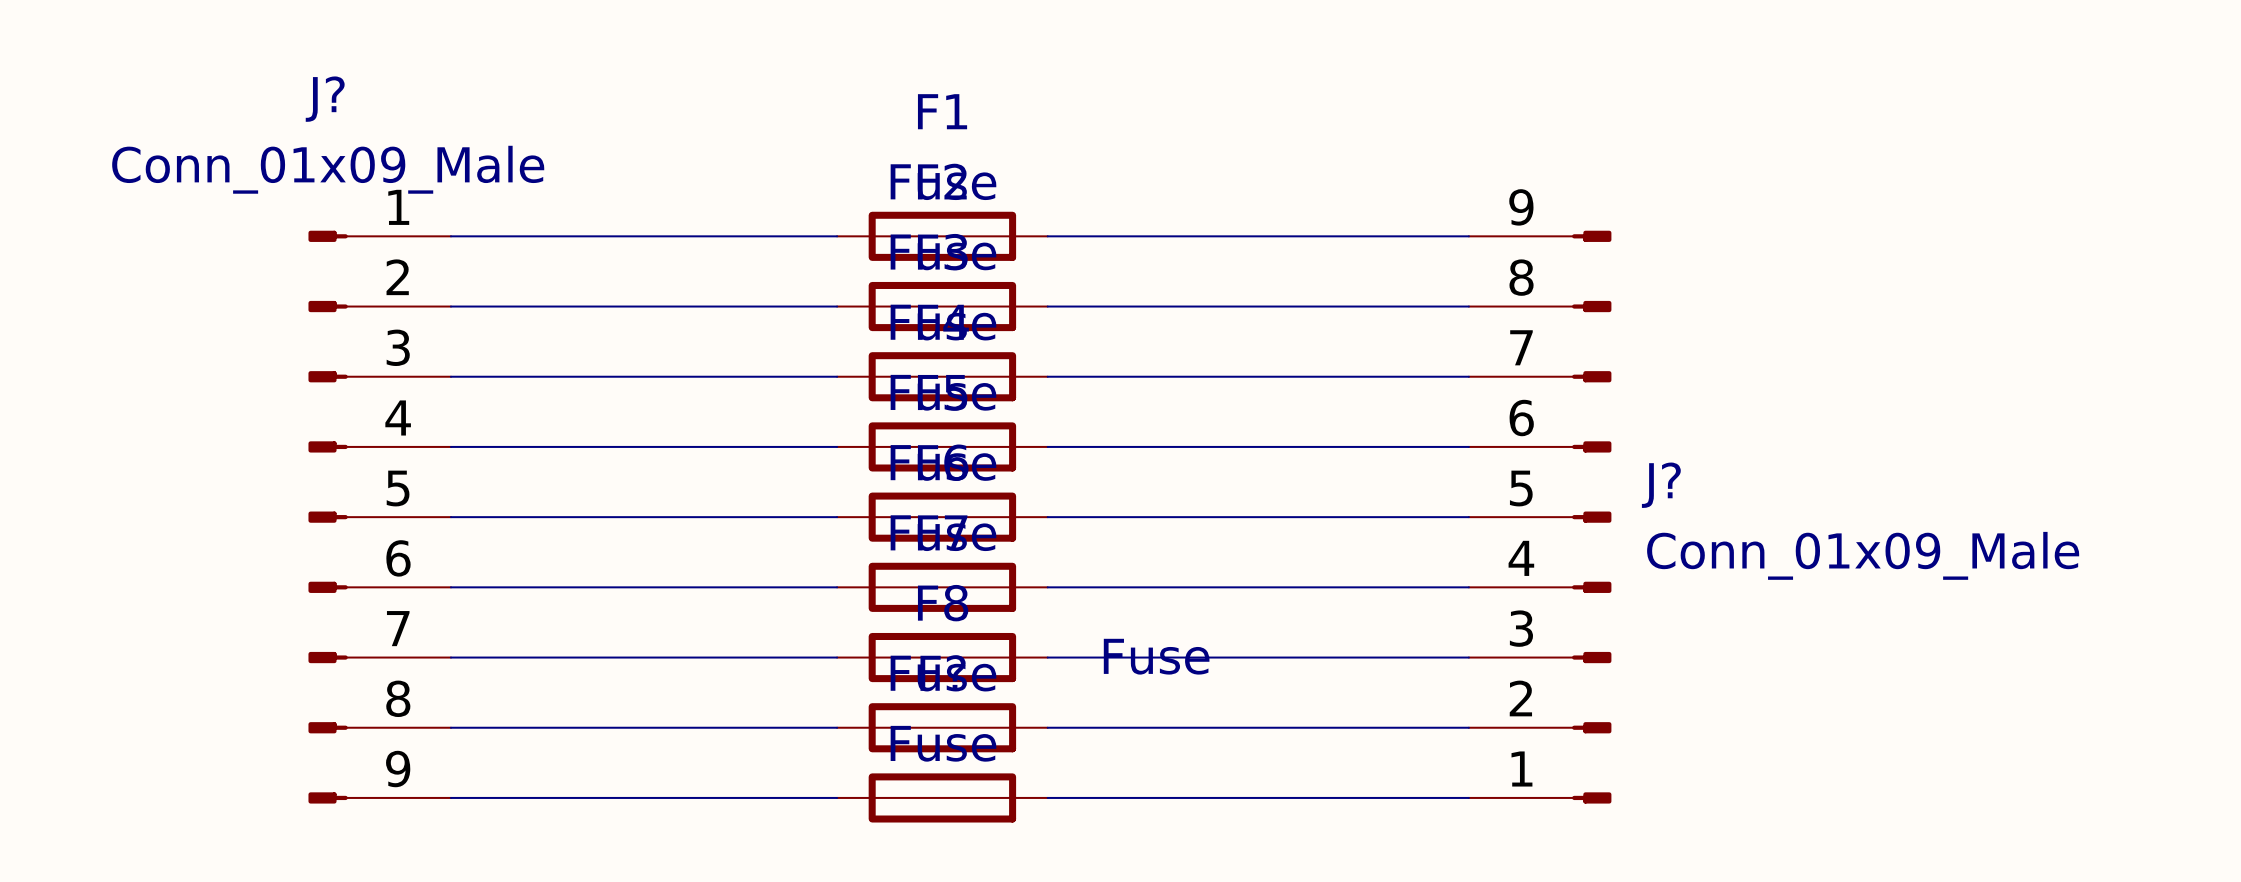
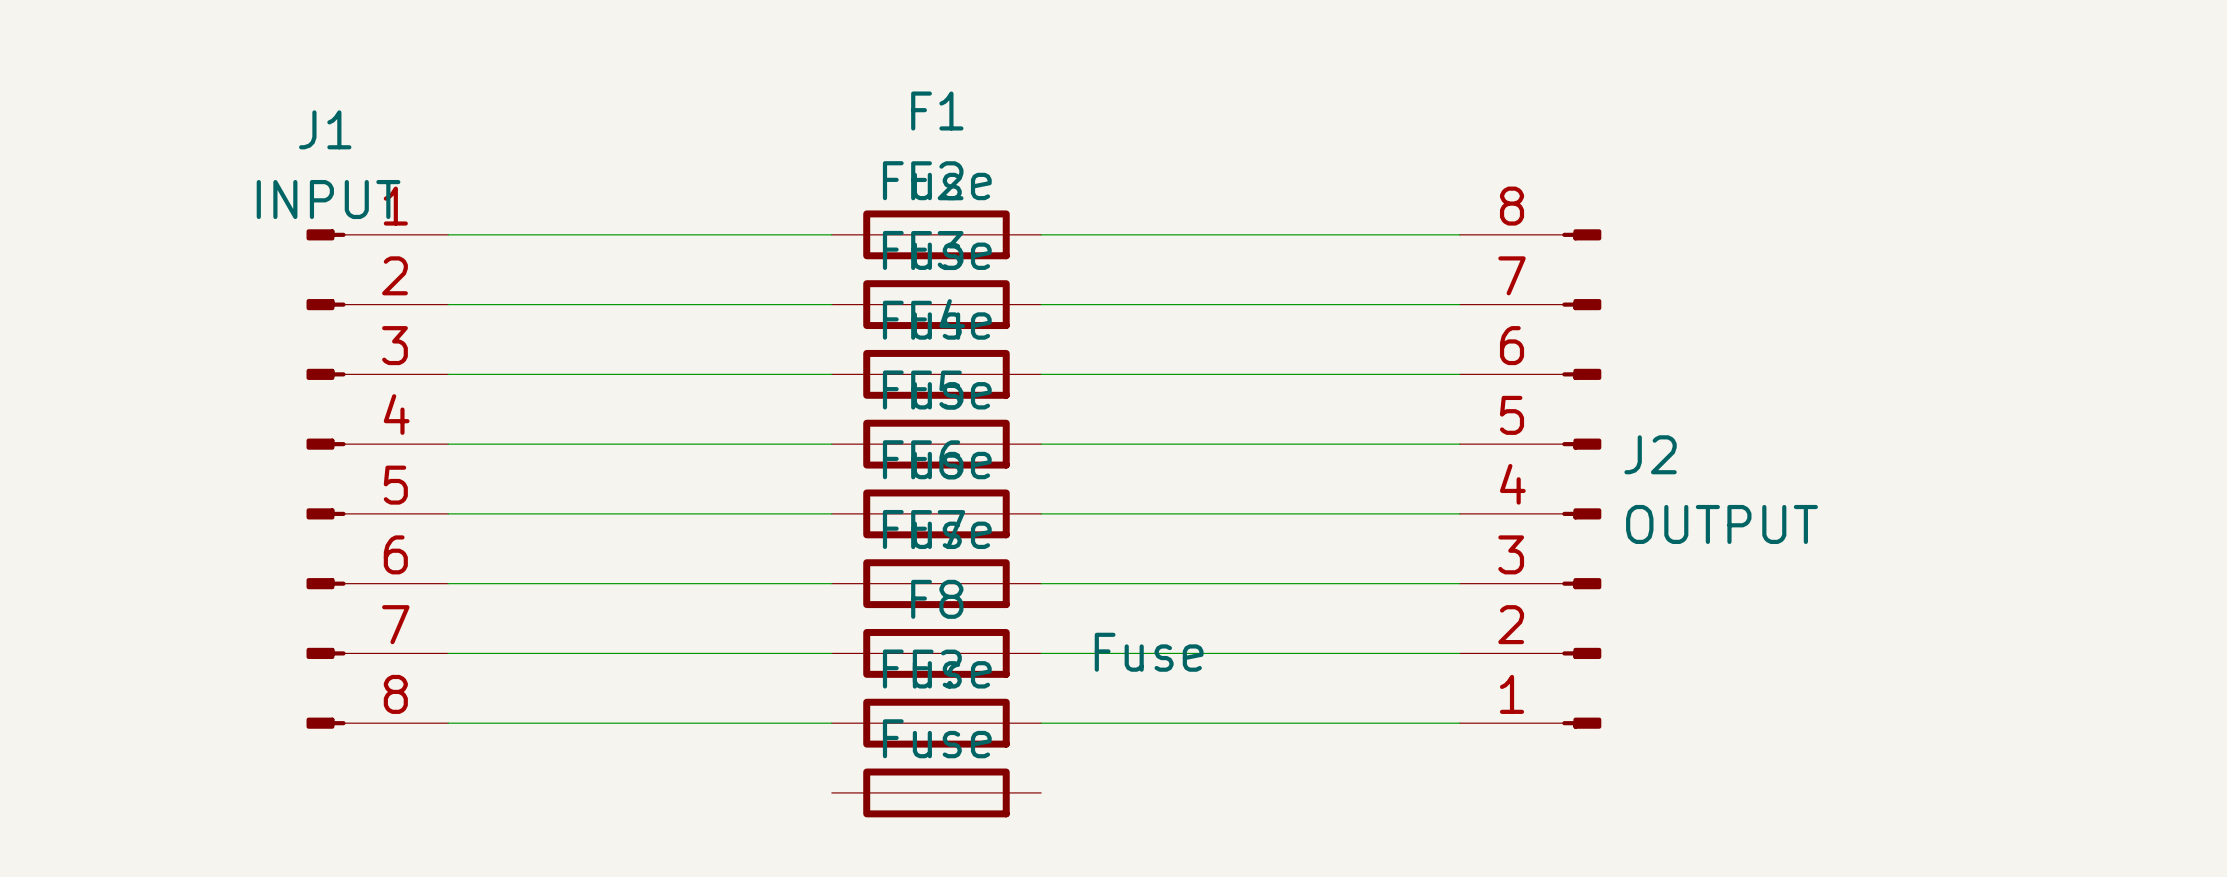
J1: none -> INPUT (377, 479)
J2: none -> OUTPUT (1530, 479)
J?: Conn_01x09_Male (379, 517) -> none
J?: Conn_01x09_Male (1540, 517) -> none
wire: (450, 797) (837, 797) -> none
wire: (1047, 797) (1468, 797) -> none

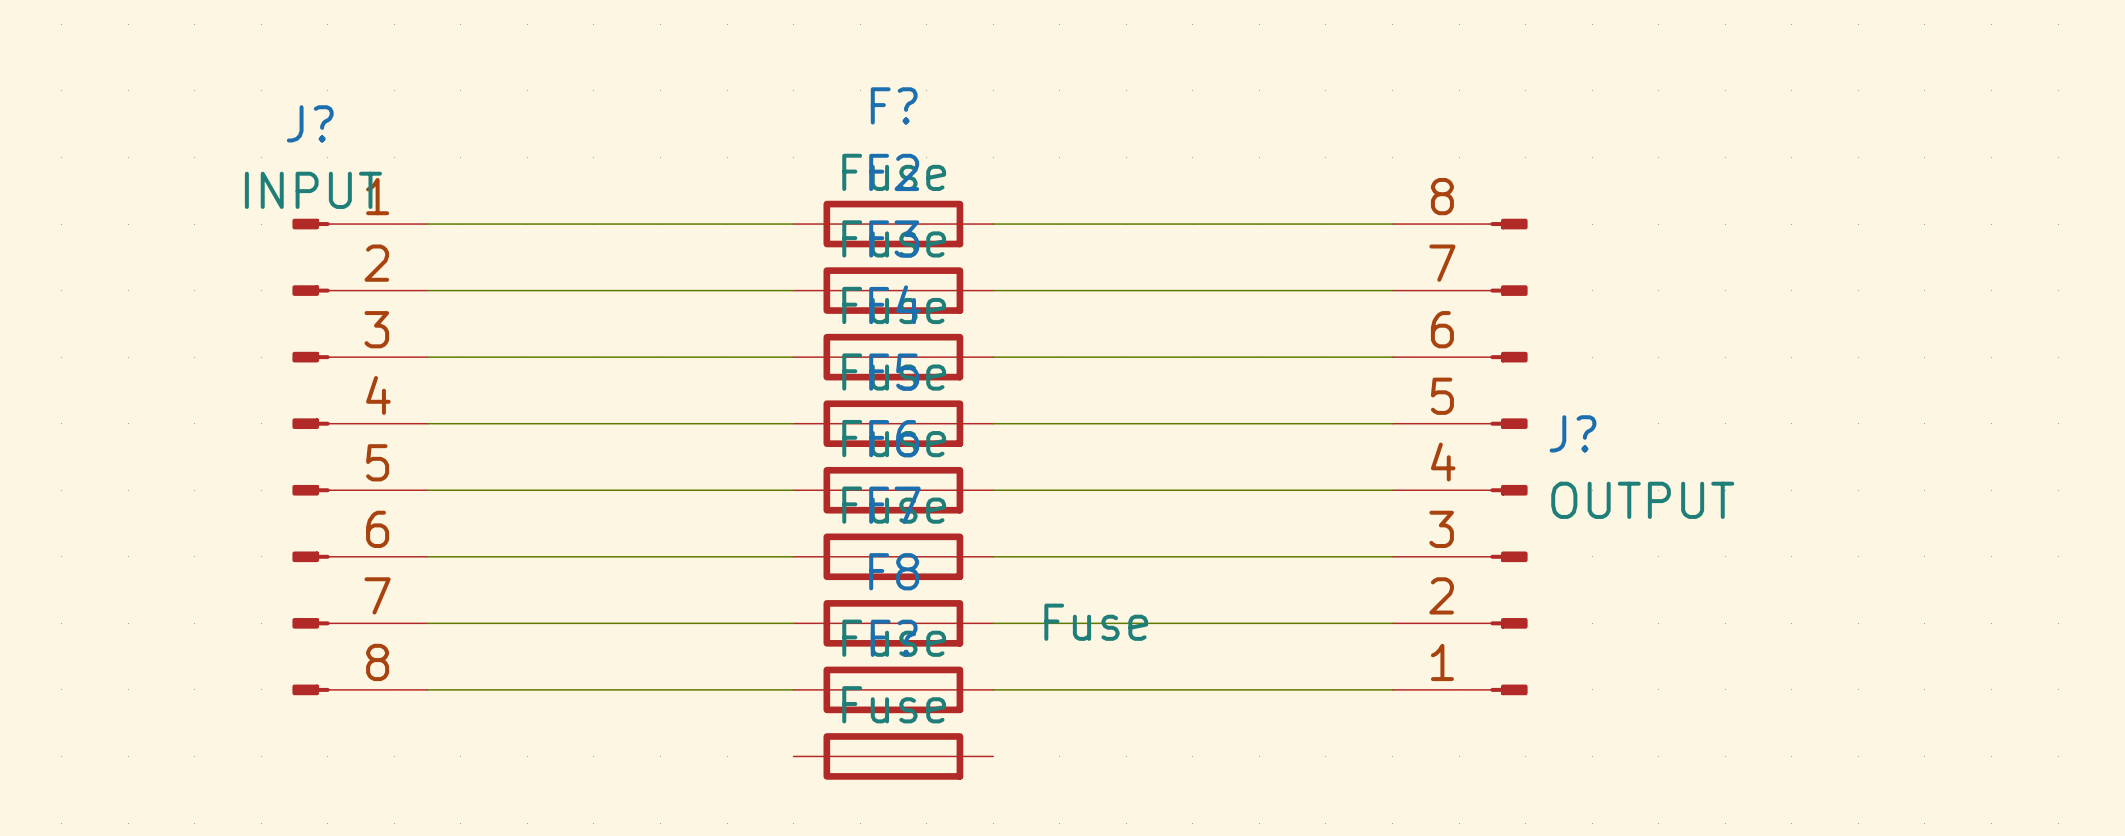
F1 name: F1 (937, 111) -> F? (894, 105)
J1 name: J1 (325, 129) -> J? (310, 123)
J2 name: J2 (1650, 454) -> J? (1573, 433)

